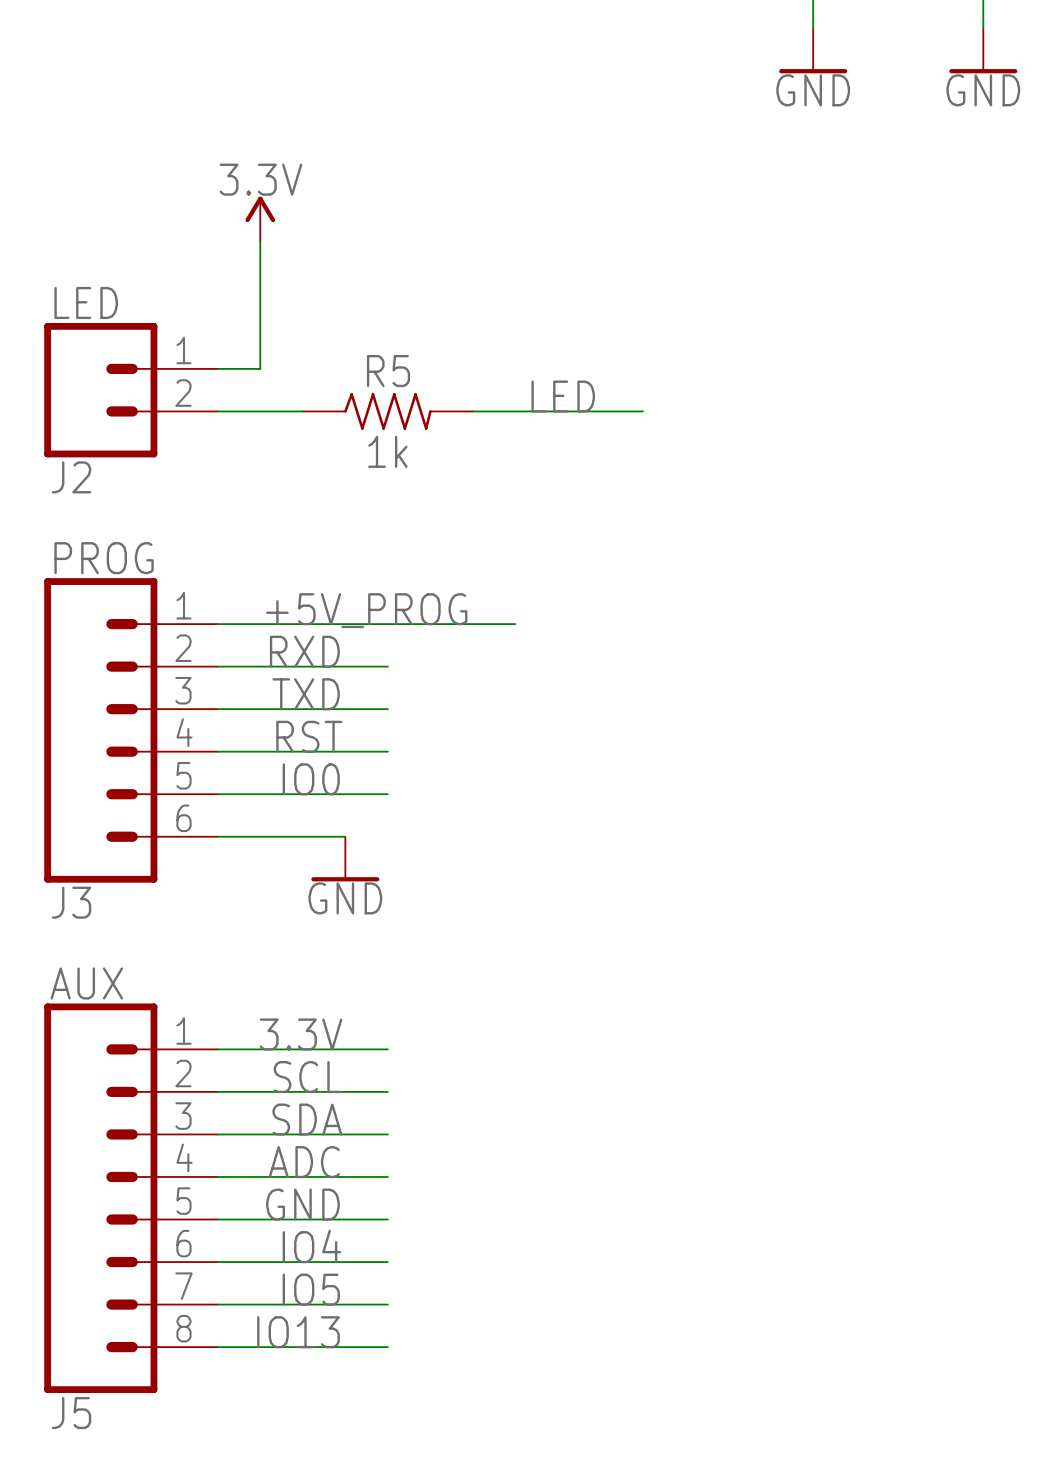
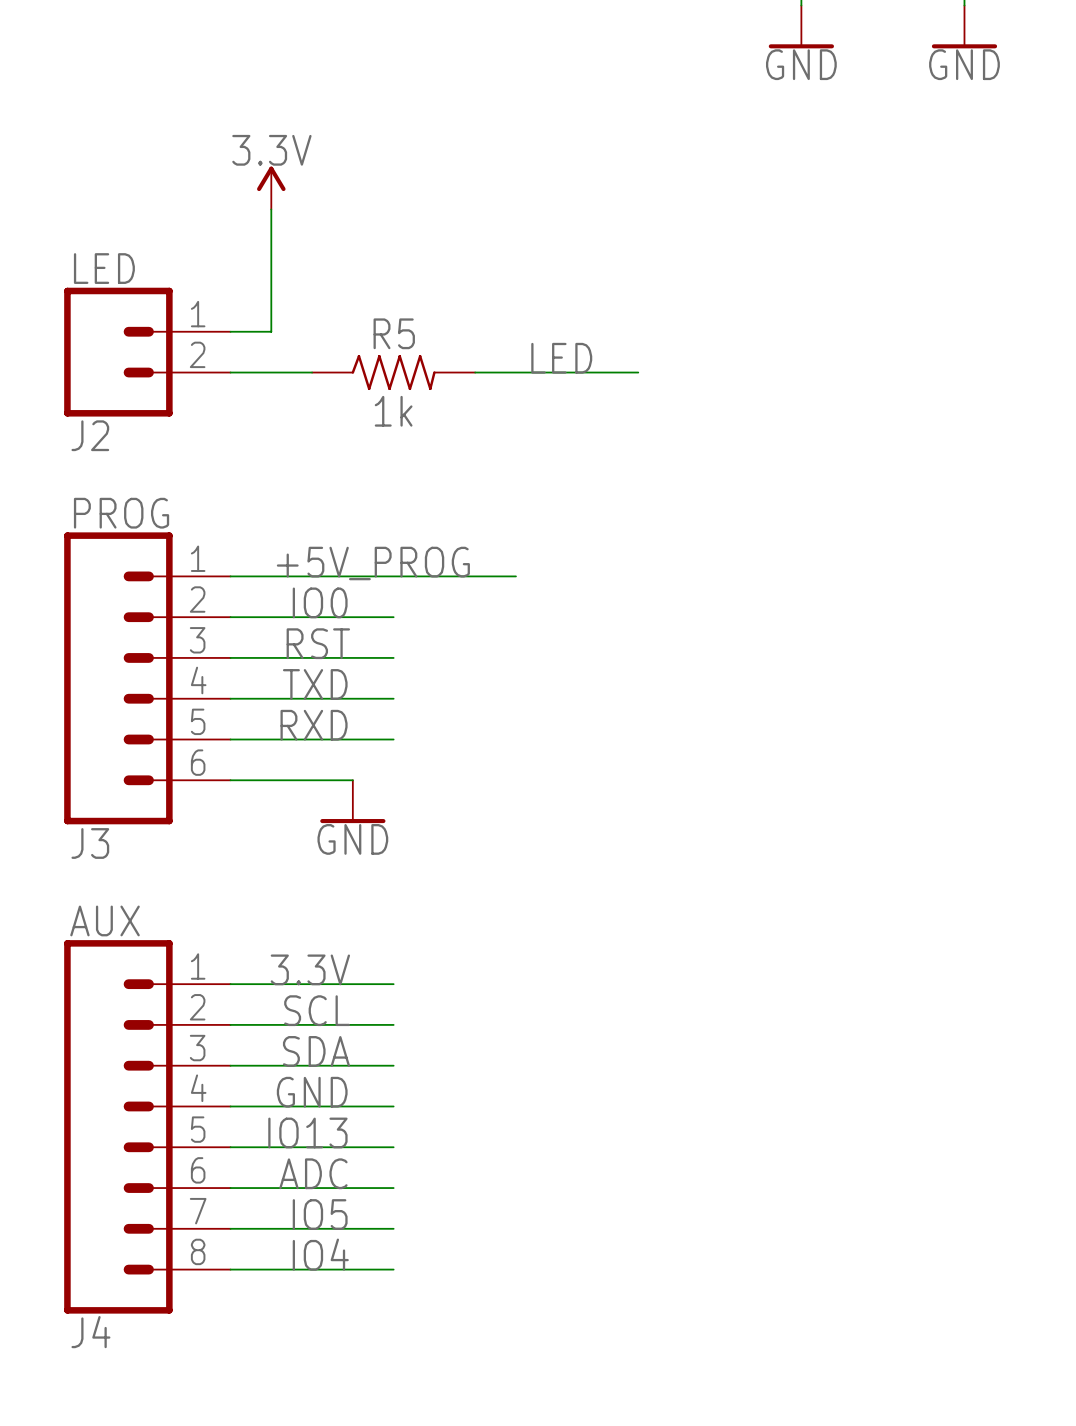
label: RXD (304, 651) -> IO0 (320, 602)
label: TXD (306, 694) -> RST (318, 643)
label: RST (309, 736) -> TXD (315, 684)
label: IO0 (311, 779) -> RXD (314, 725)
label: ADC (304, 1162) -> GND (312, 1092)
label: GND (302, 1204) -> IO13 (307, 1132)
label: IO4 (311, 1246) -> ADC (313, 1173)
label: IO13 (298, 1332) -> IO4 (320, 1254)
J5 name: J5 (71, 1413) -> J4 (90, 1332)

